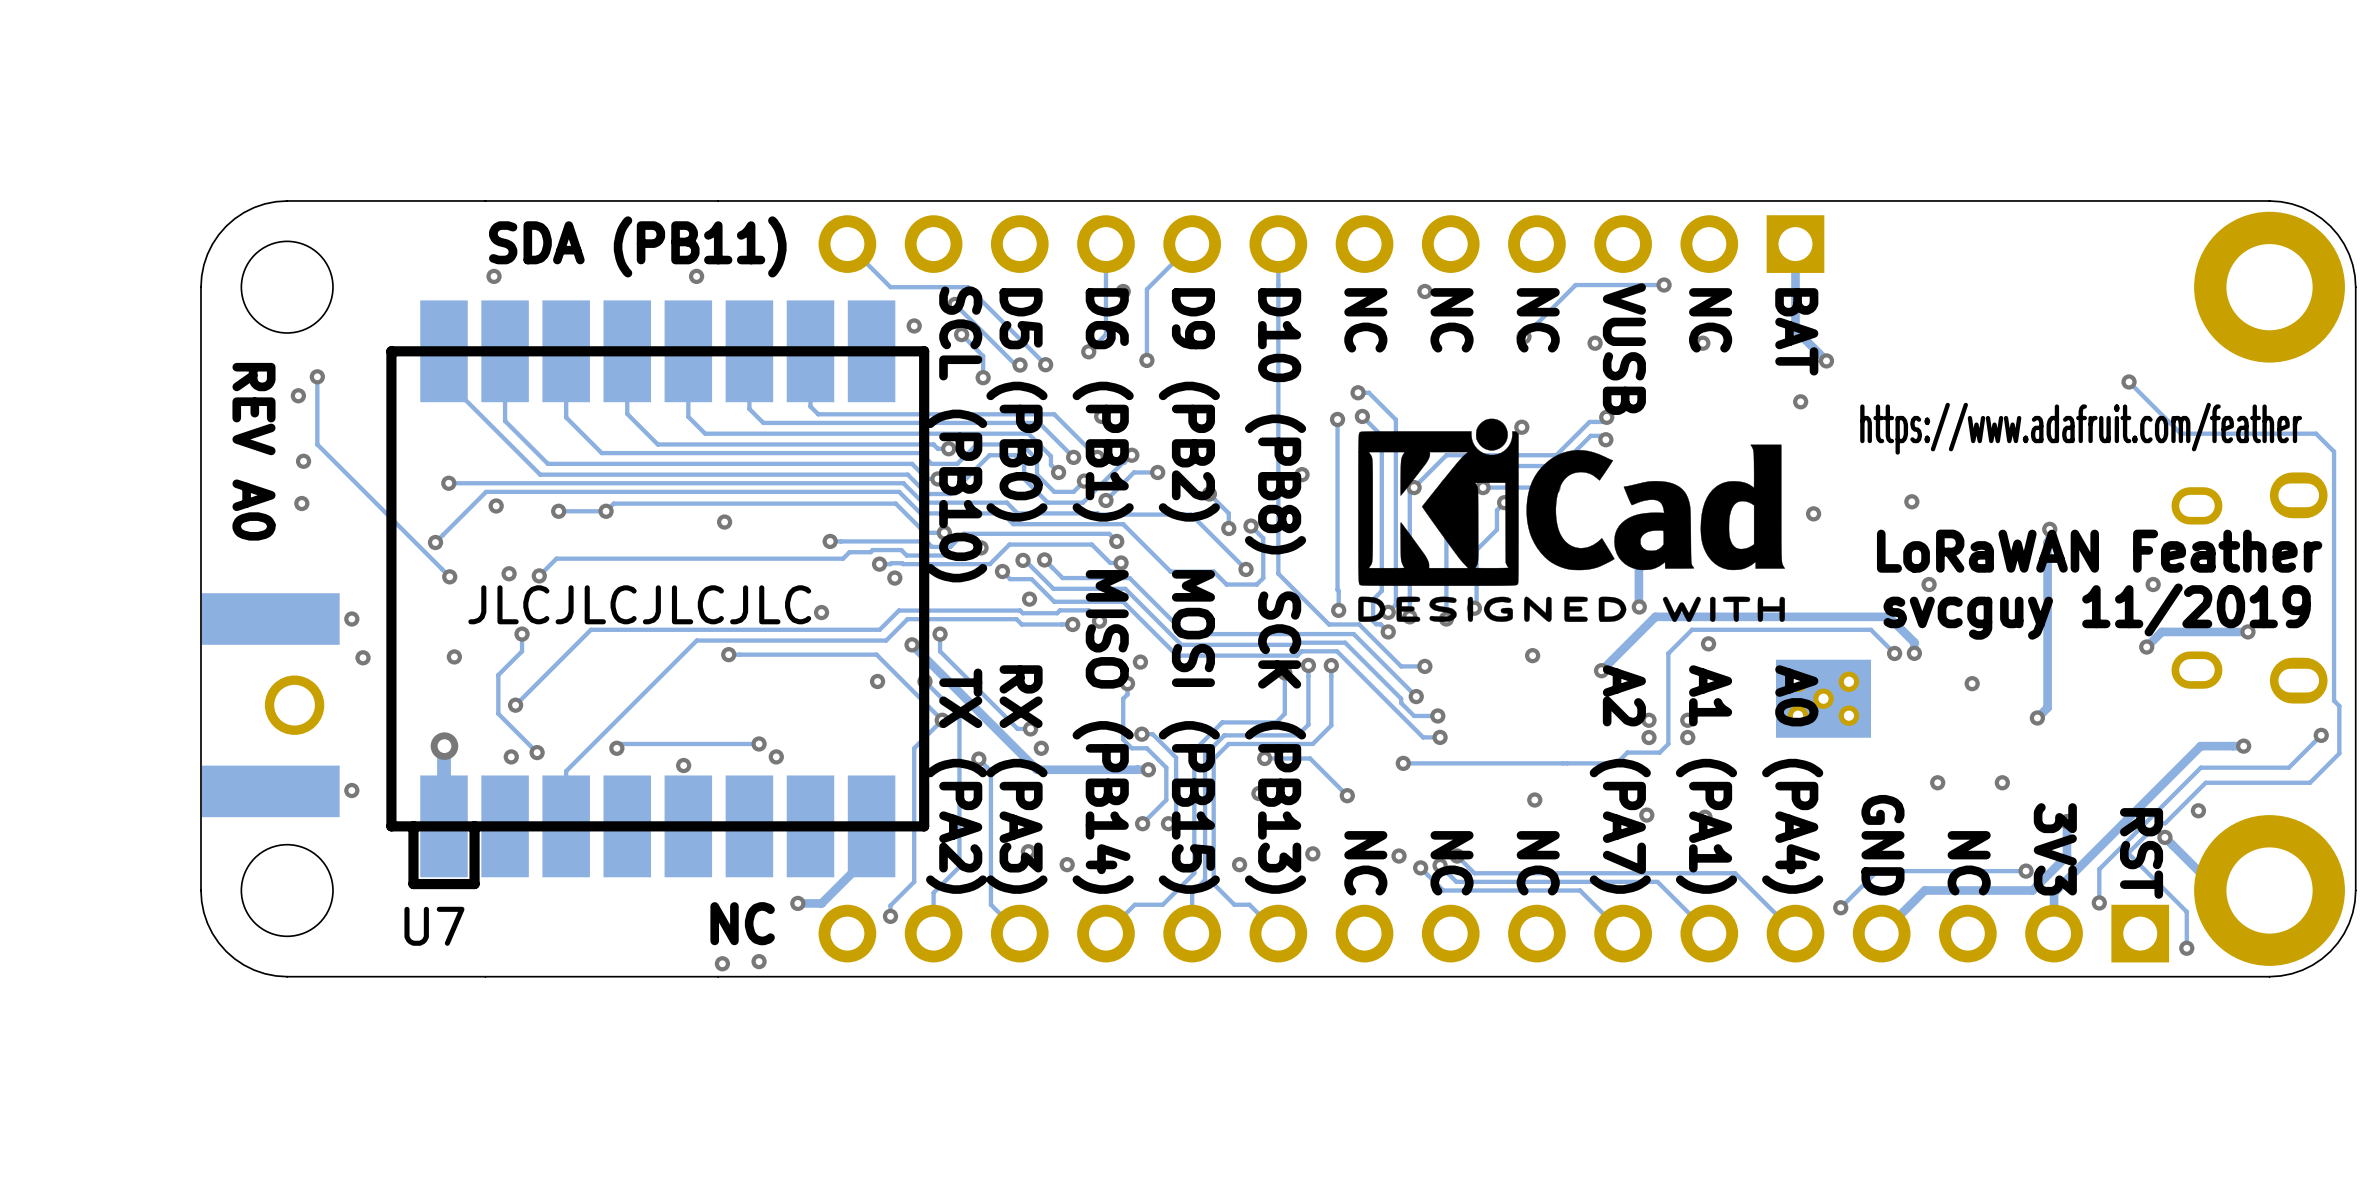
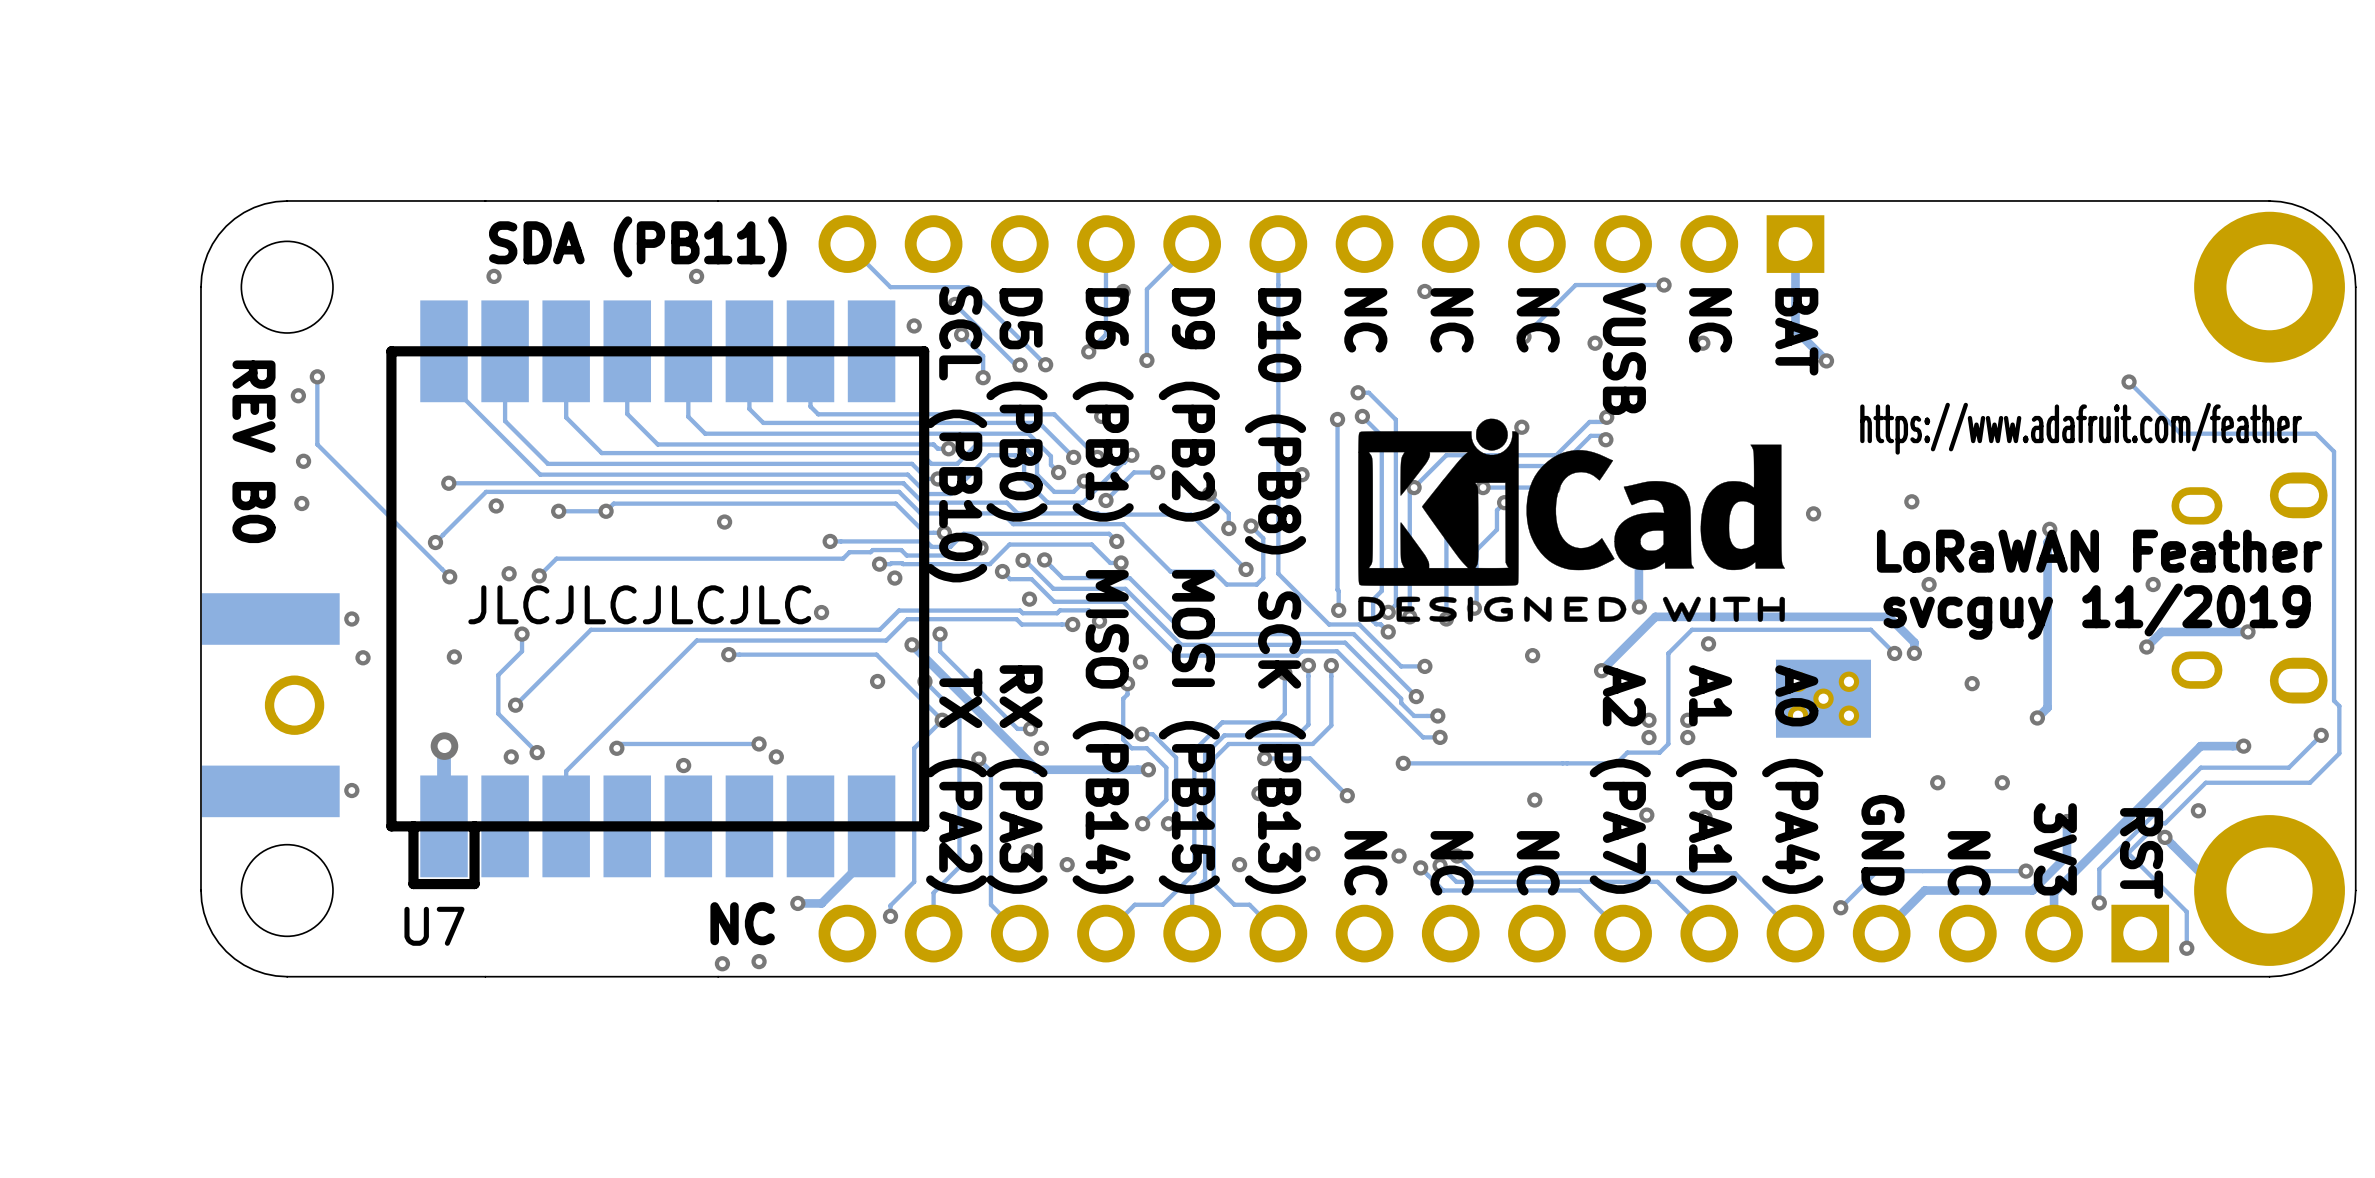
via: (1800, 401) -> none
text: REV A0 (253, 451) -> REV B0 (253, 451)

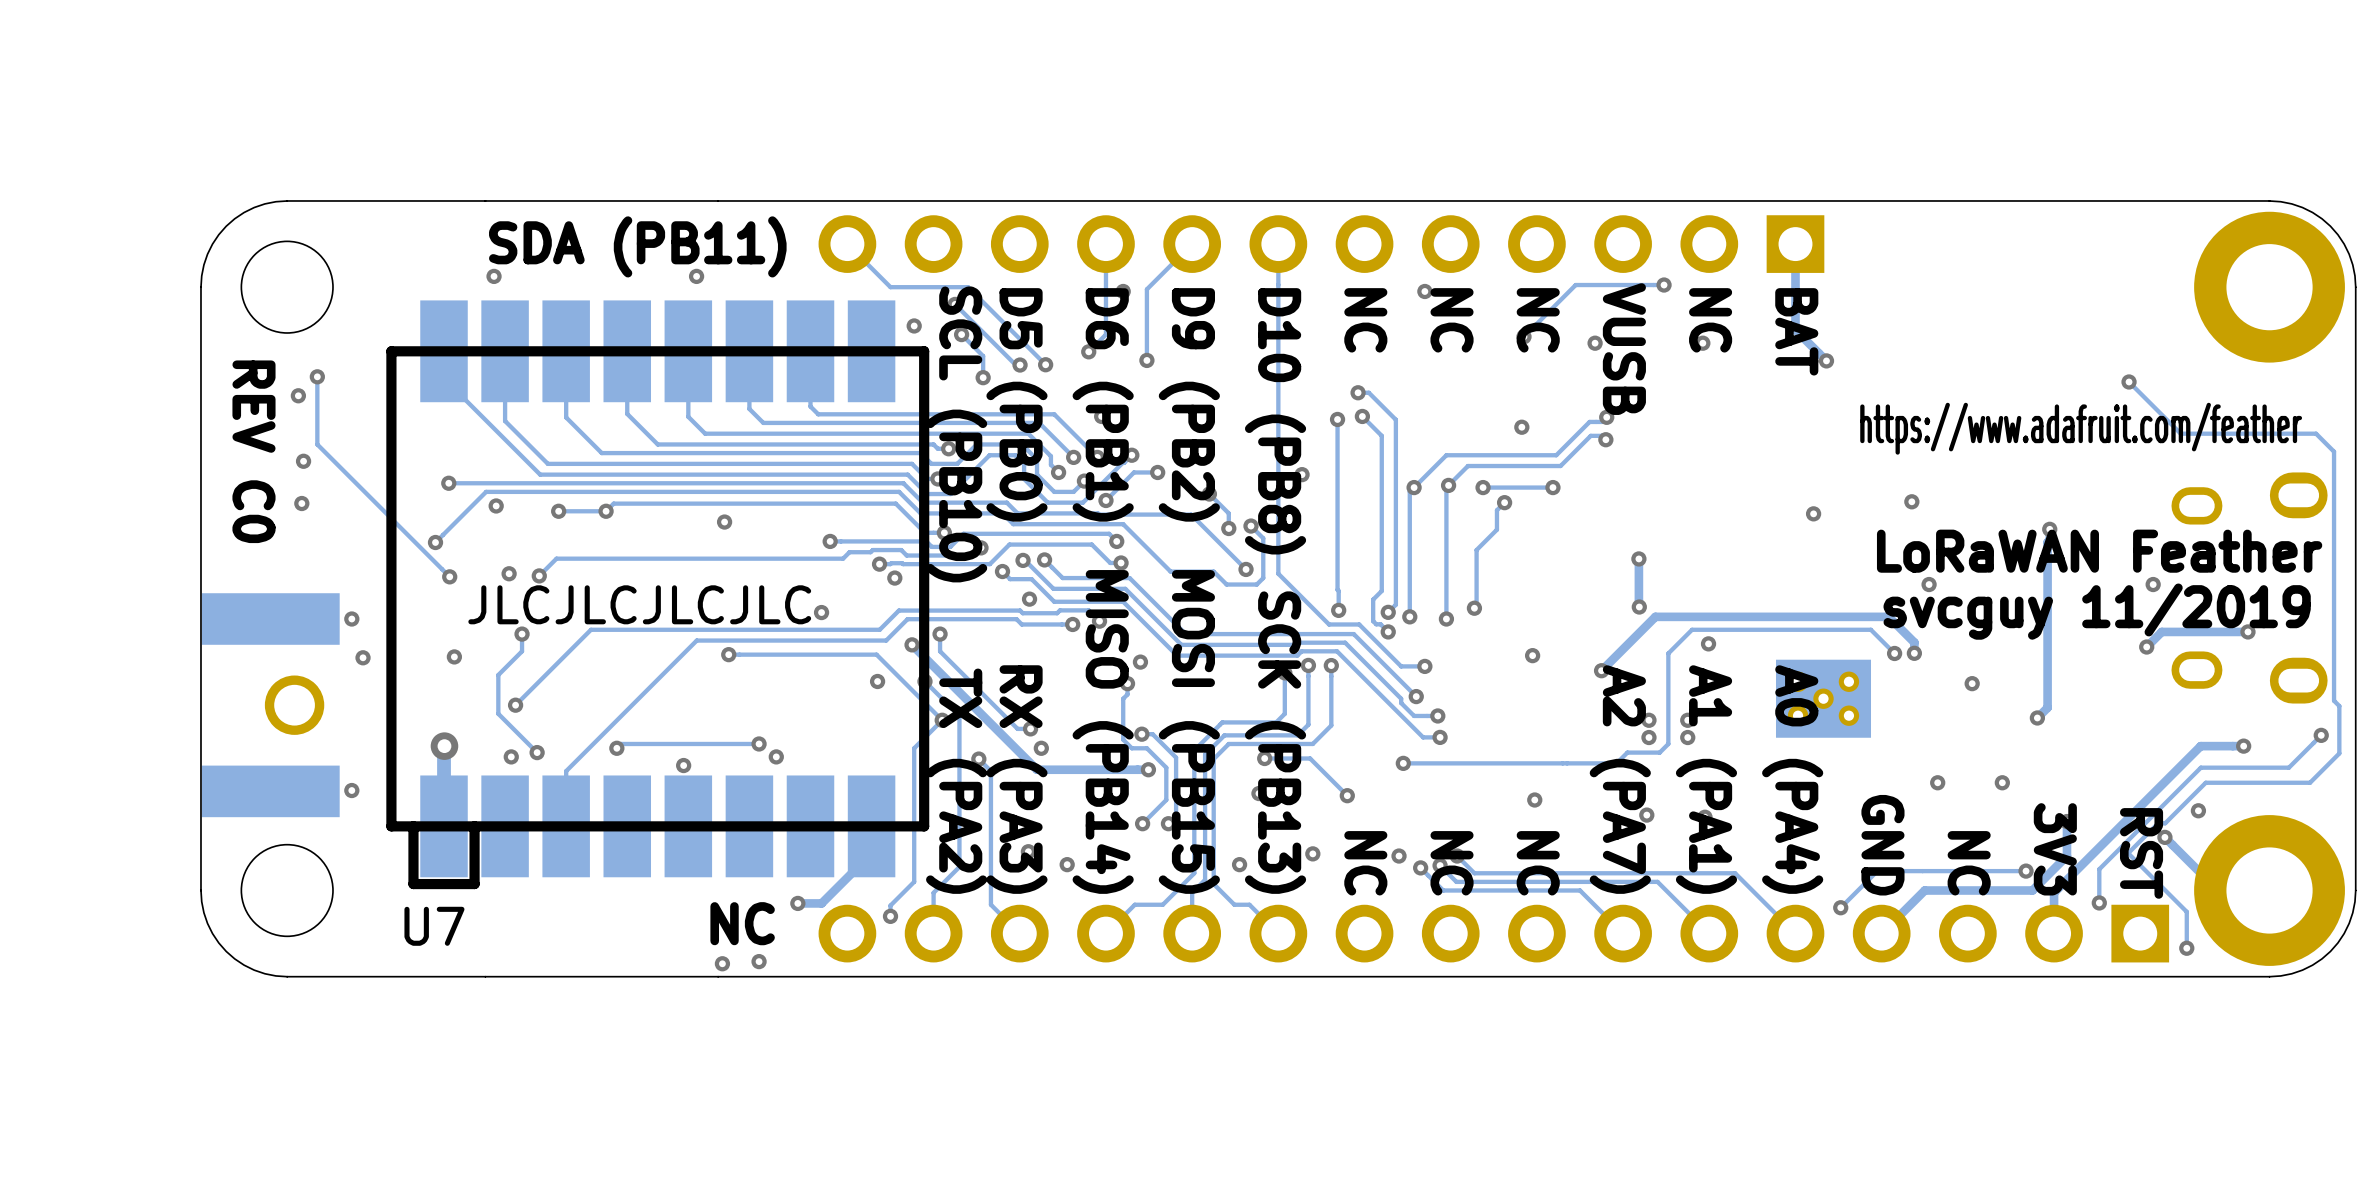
drawing: [1358, 418, 1785, 622] -> none
text: REV B0 (253, 451) -> REV C0 (253, 451)

